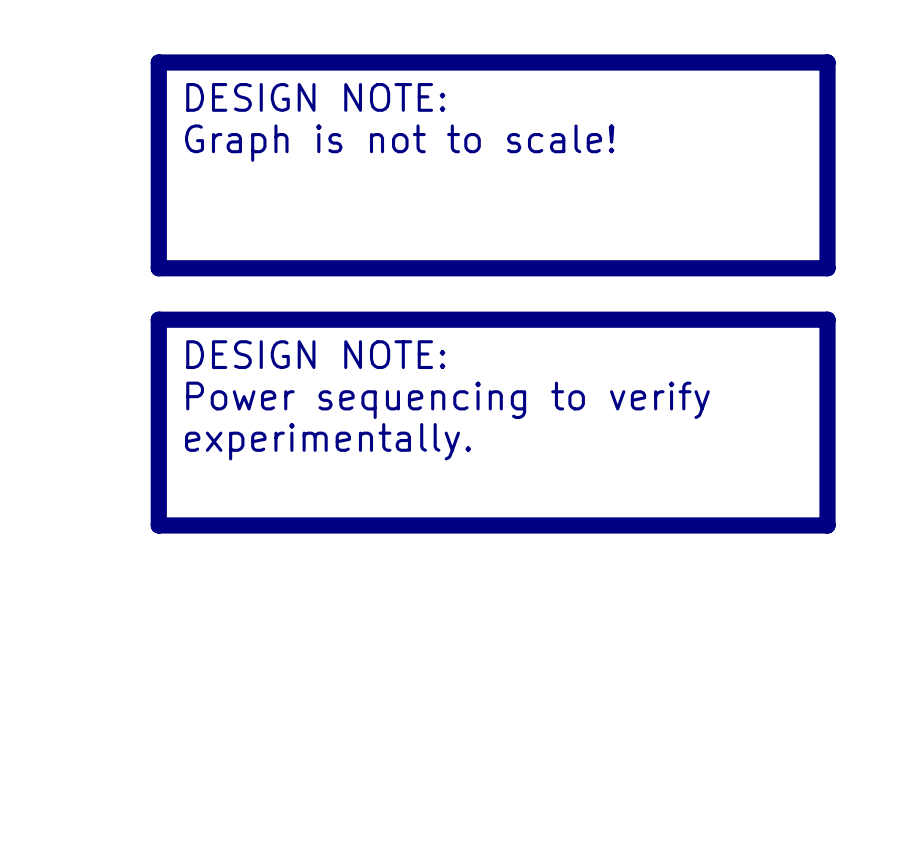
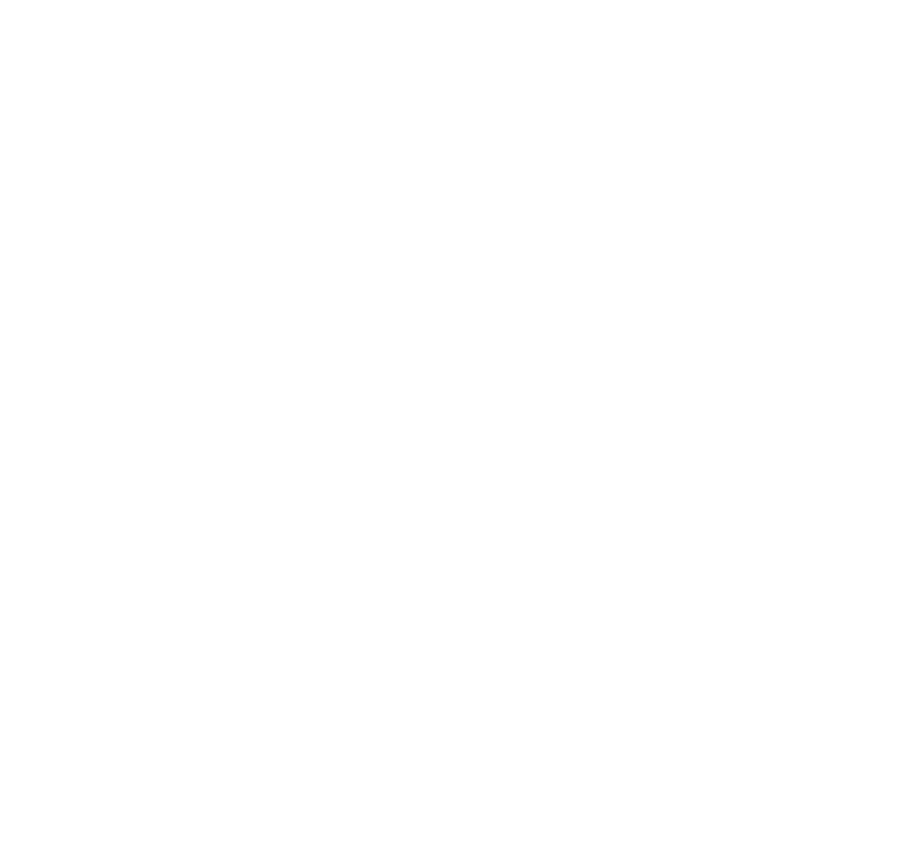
line: (158, 62) (827, 62) (827, 268) (158, 268) (158, 62) -> none
text: DESIGN NOTE: (315, 97) -> none
text: Graph is not to scale! (399, 143) -> none
line: (158, 319) (158, 525) (827, 525) (827, 319) (158, 319) -> none
text: DESIGN NOTE: (315, 354) -> none
text: Power sequencing to verify (448, 400) -> none
text: experimentally. (328, 441) -> none

